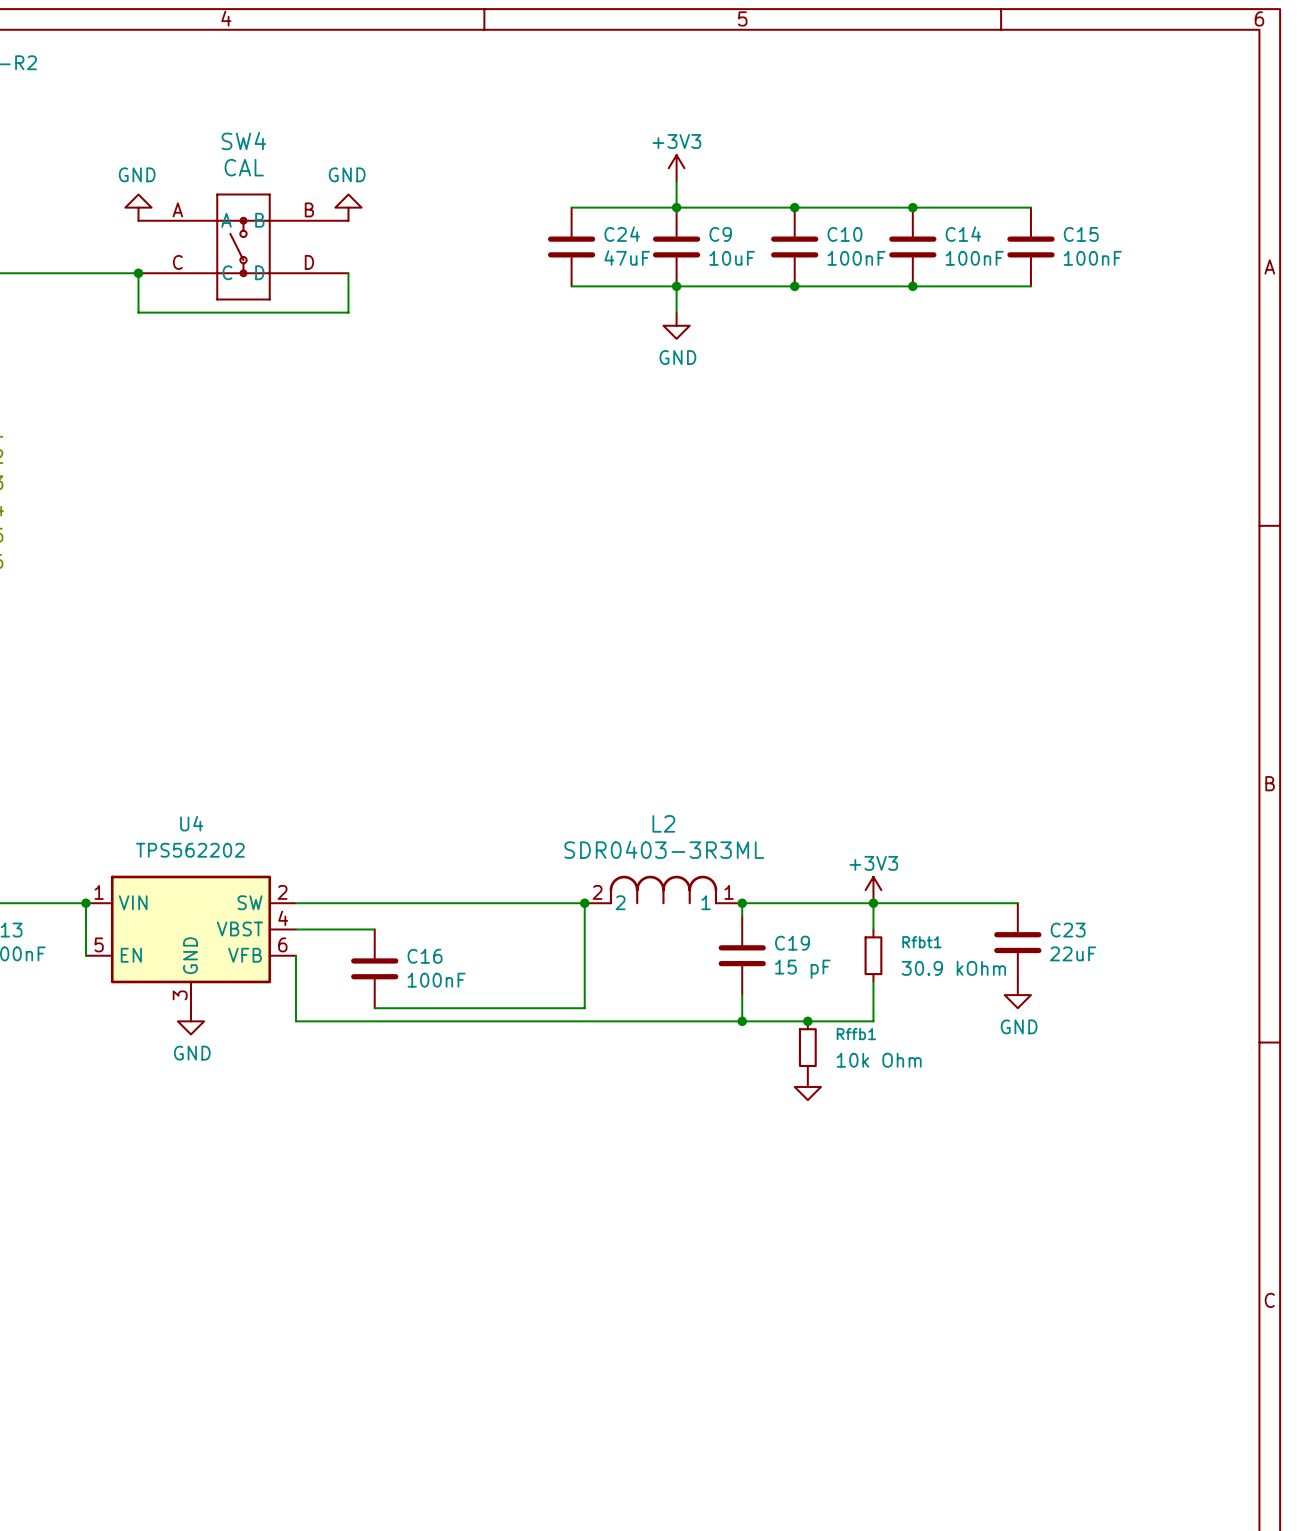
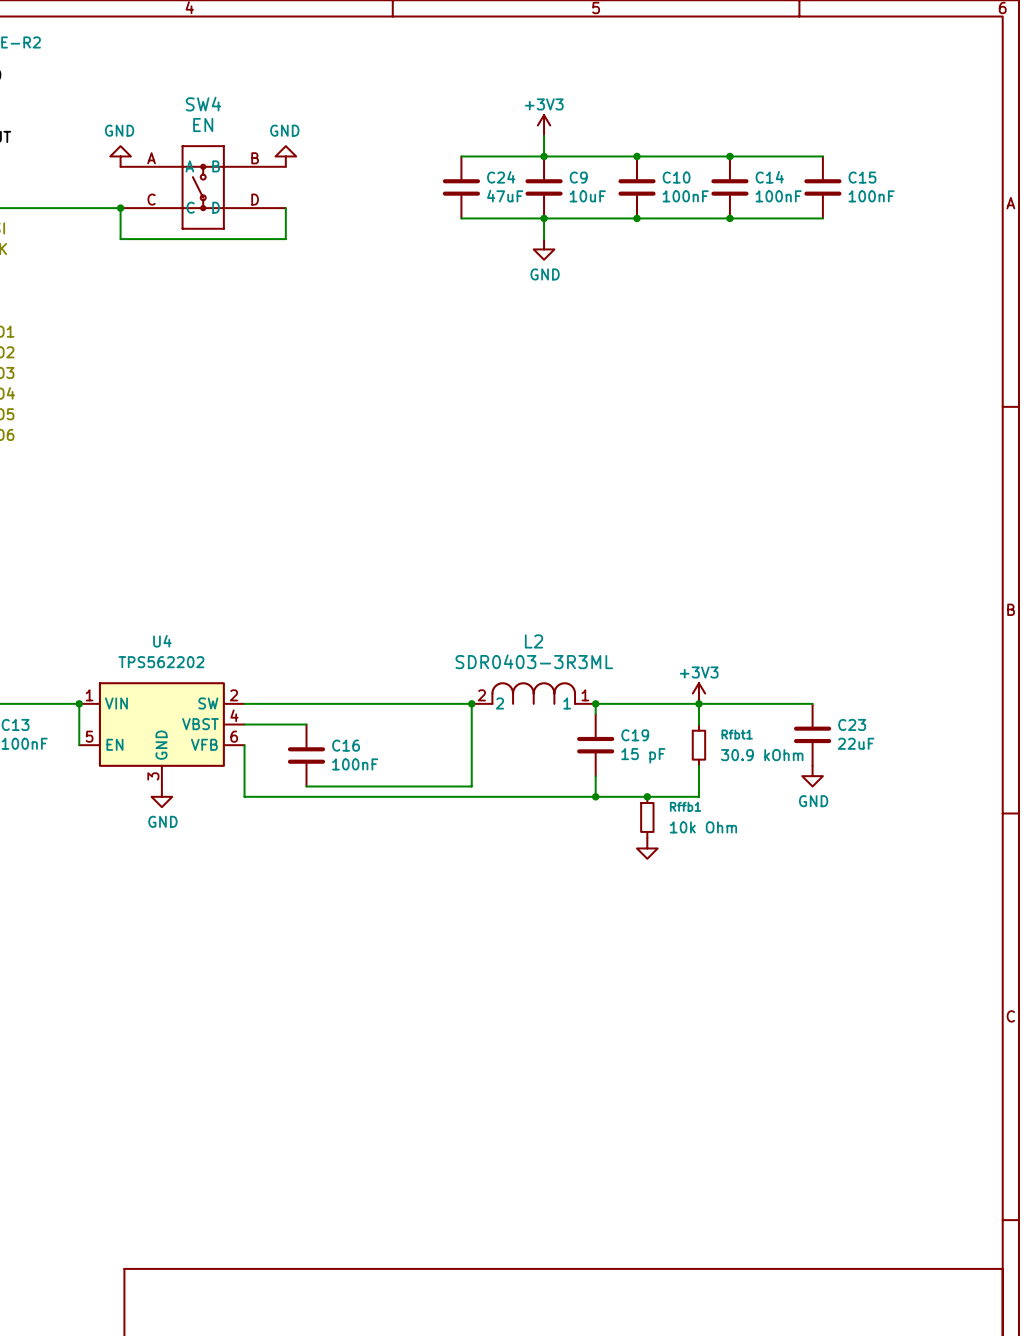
SW4 value: CAL (244, 167) -> EN (203, 125)

